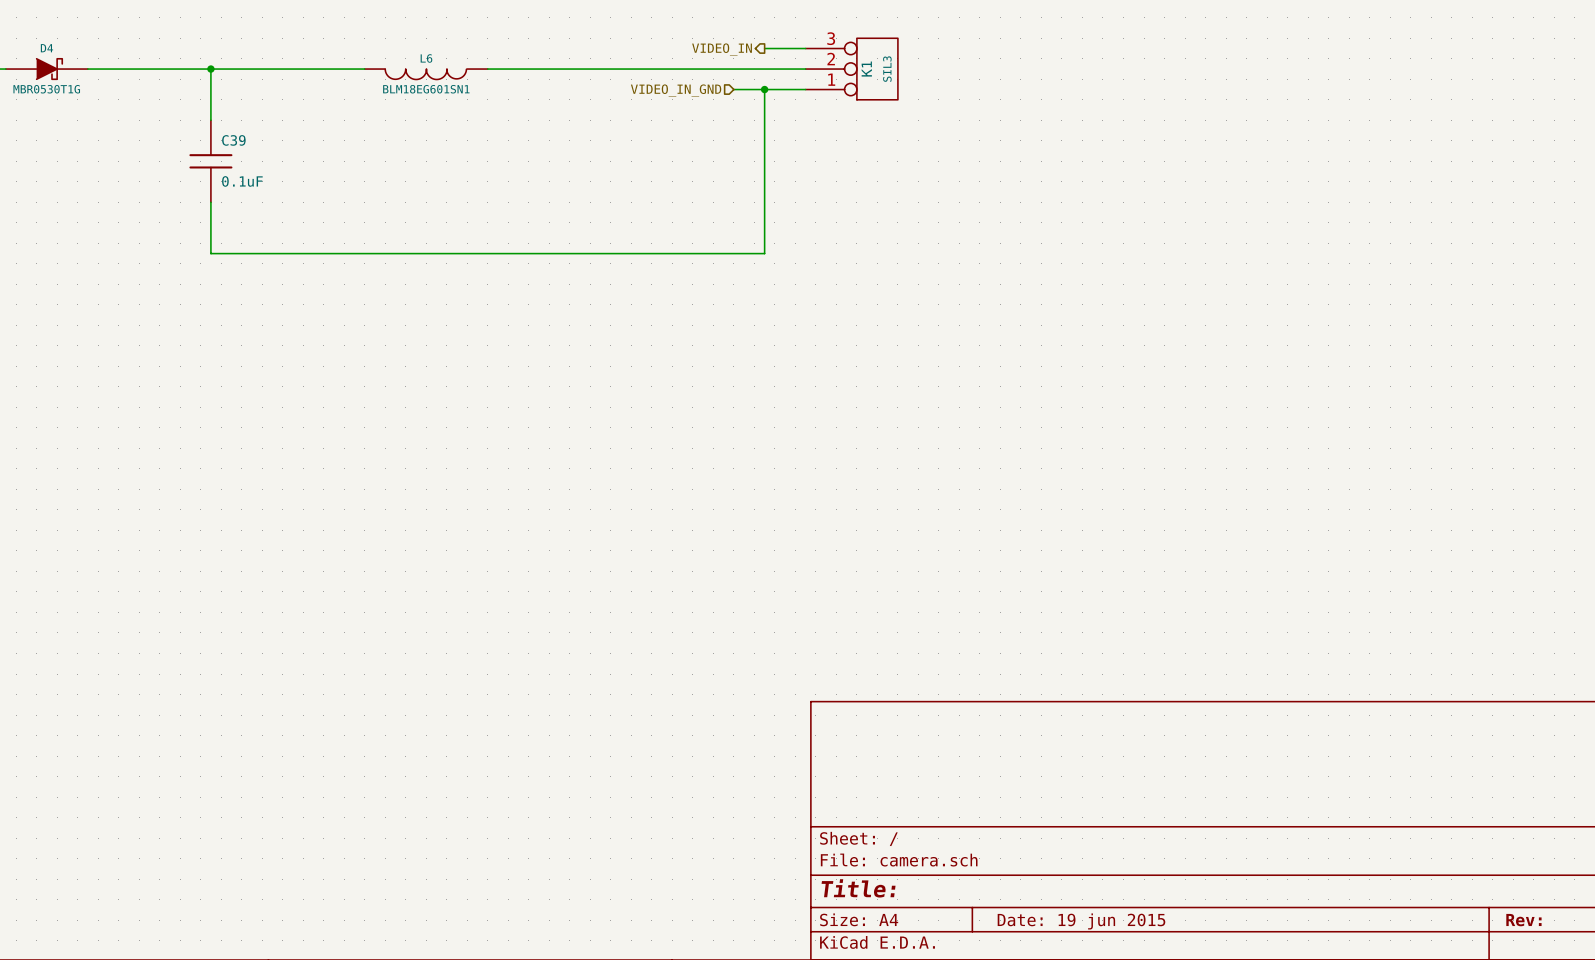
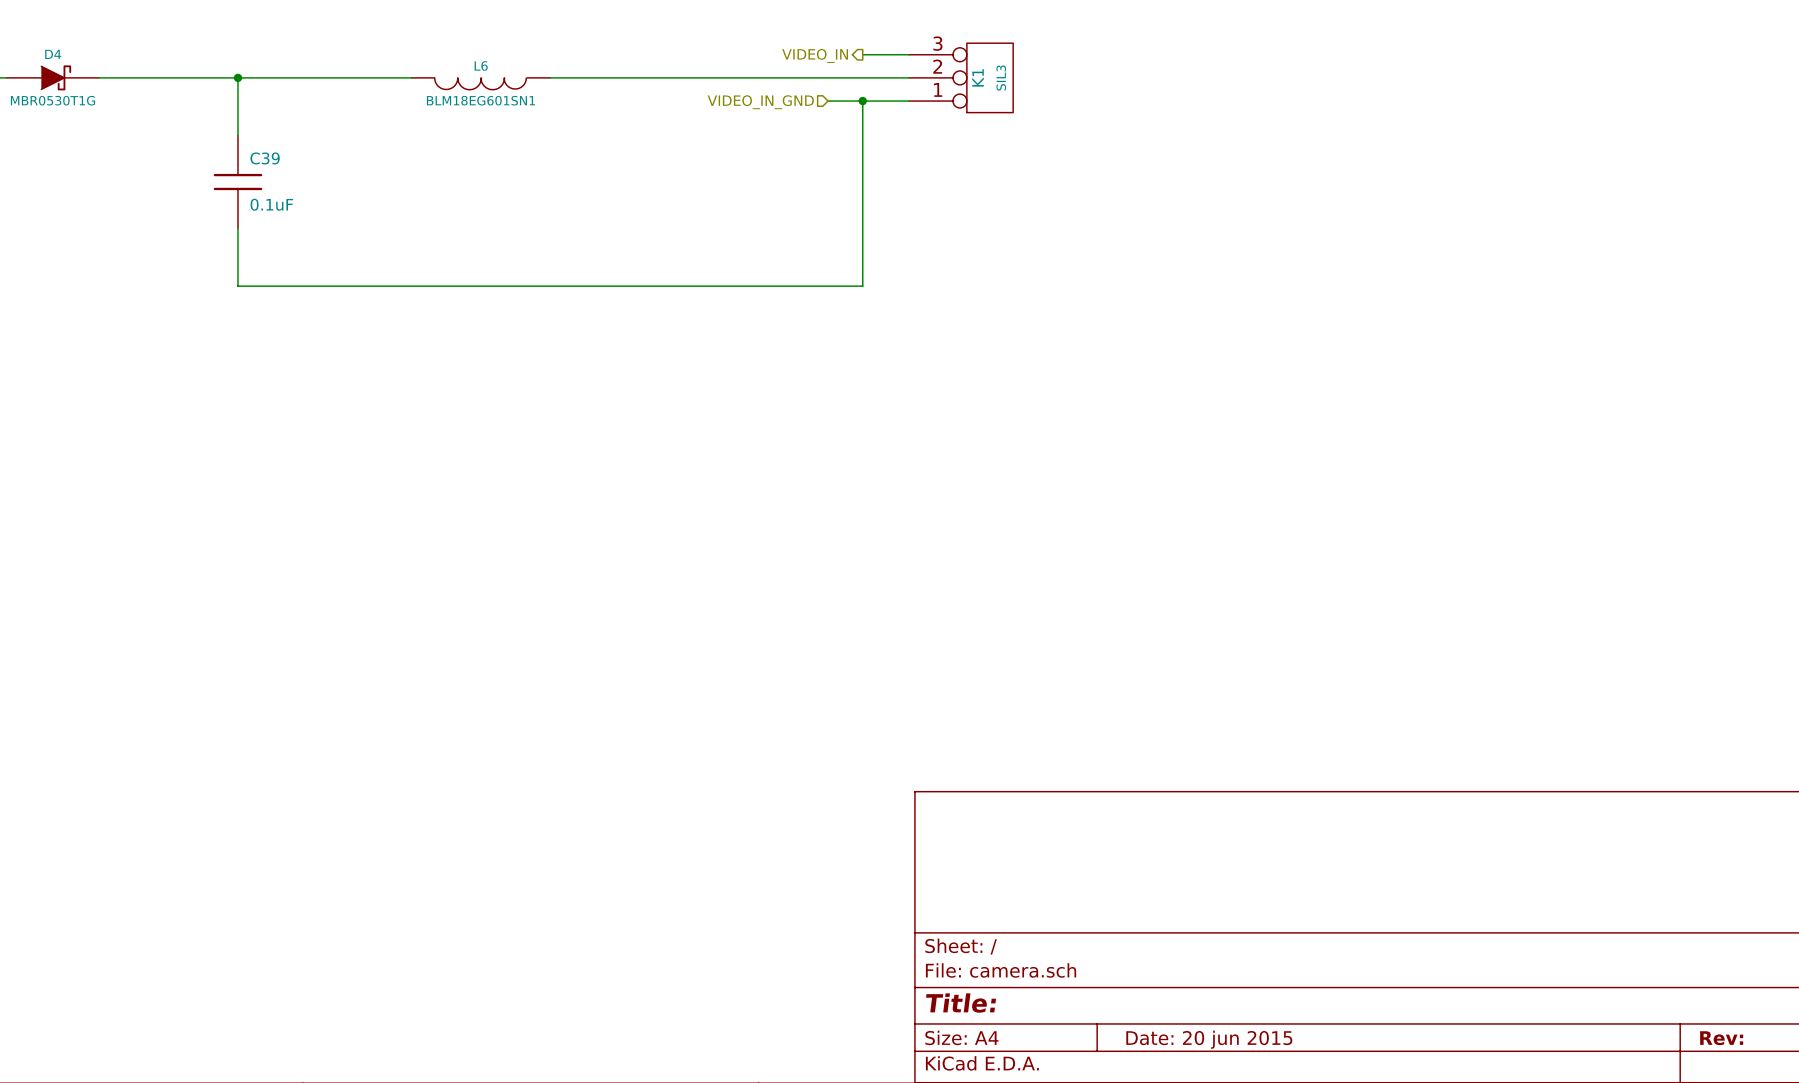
title block: Date: 19 jun 2015 (1081, 921) -> Date: 20 jun 2015 (1209, 1039)

